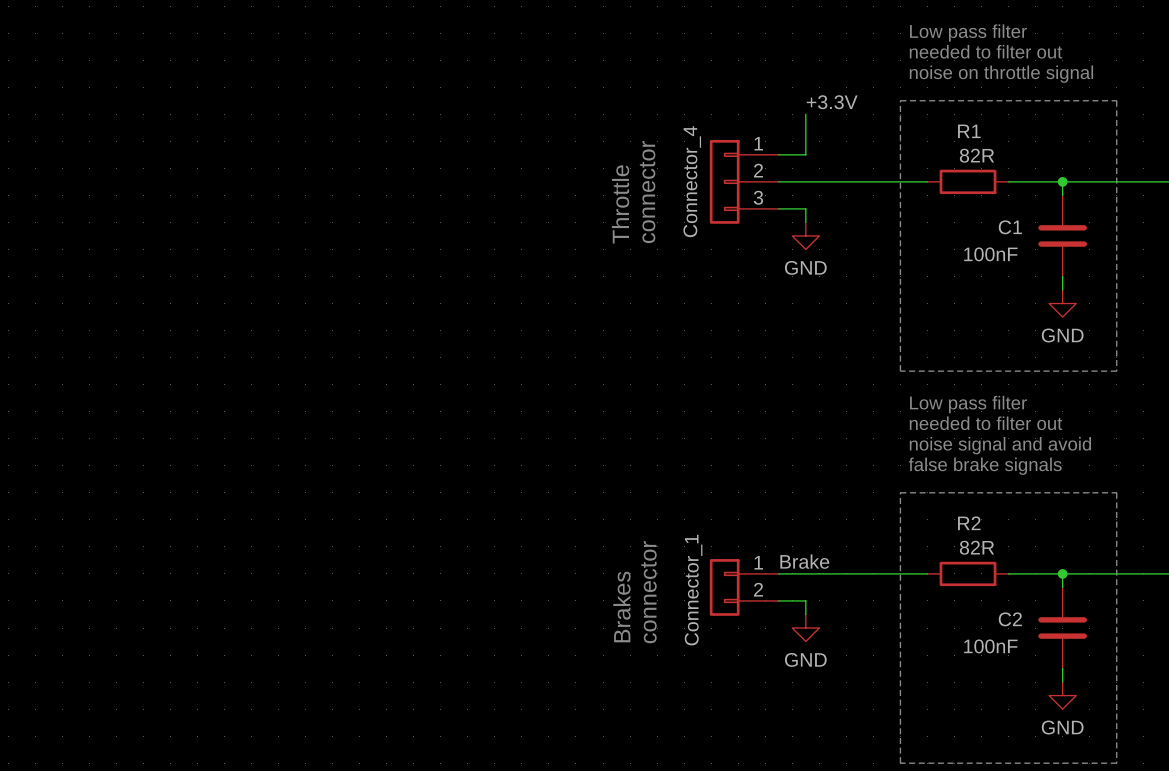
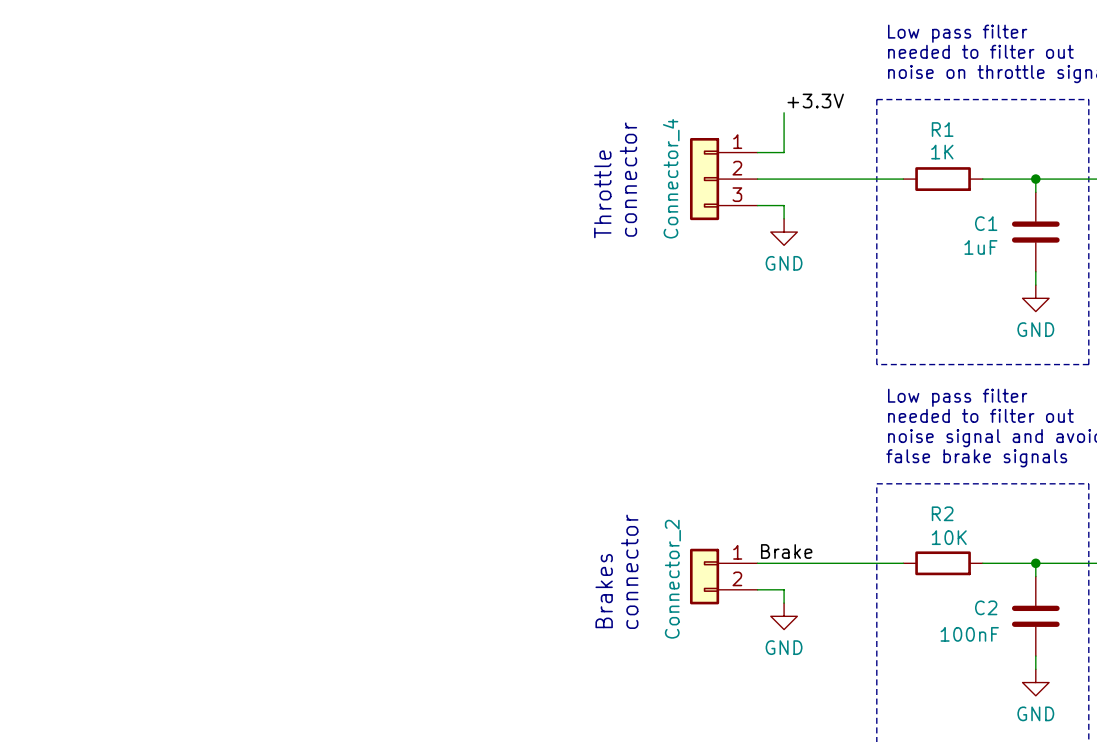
R1 value: 82R (977, 155) -> 1K (942, 152)
C1 value: 100nF (990, 254) -> 1uF (980, 247)
R2 value: 82R (977, 547) -> 10K (949, 537)
Connector_1 name: Connector_1 (693, 590) -> Connector_2 (672, 579)

